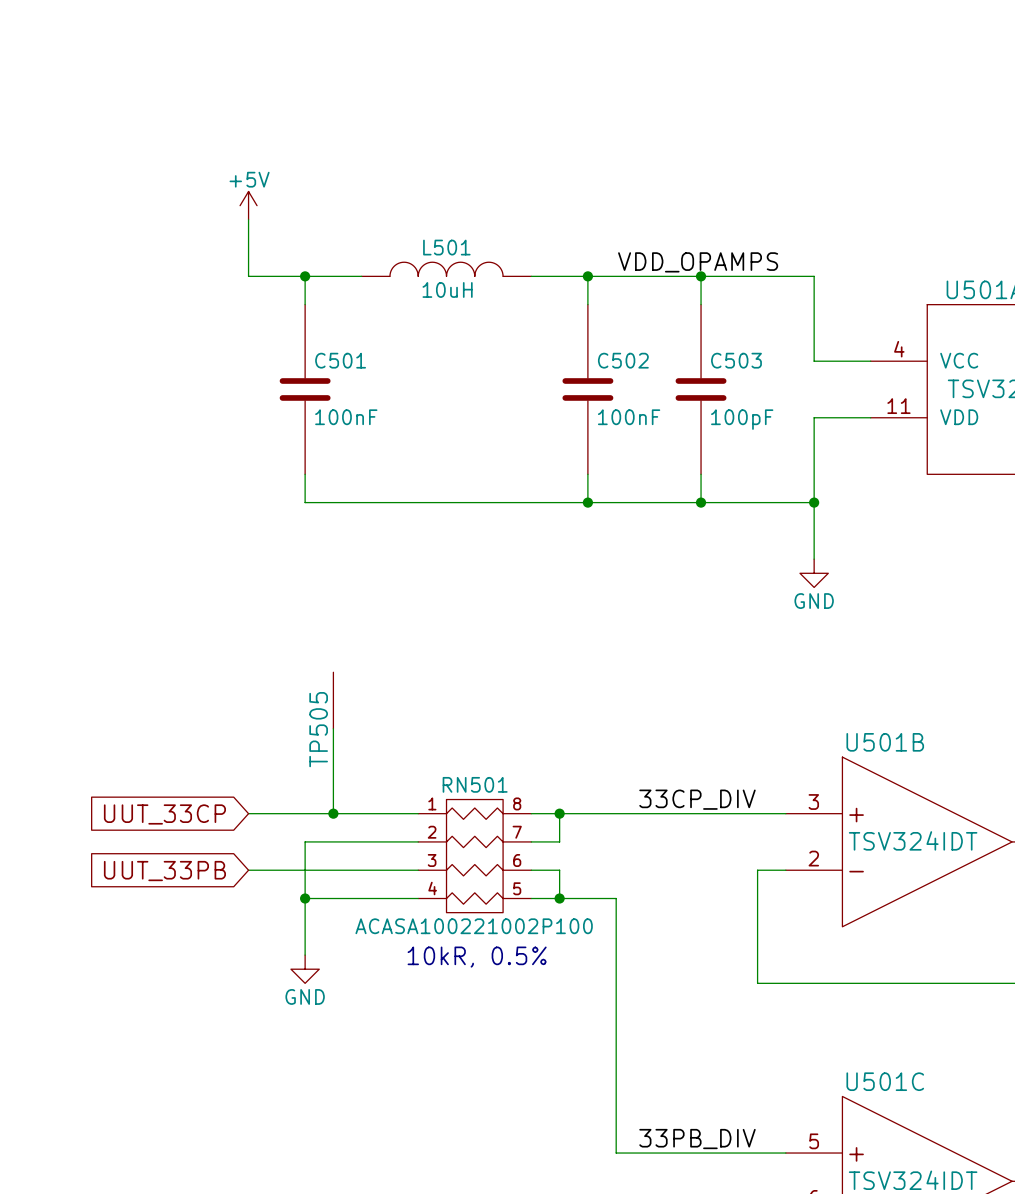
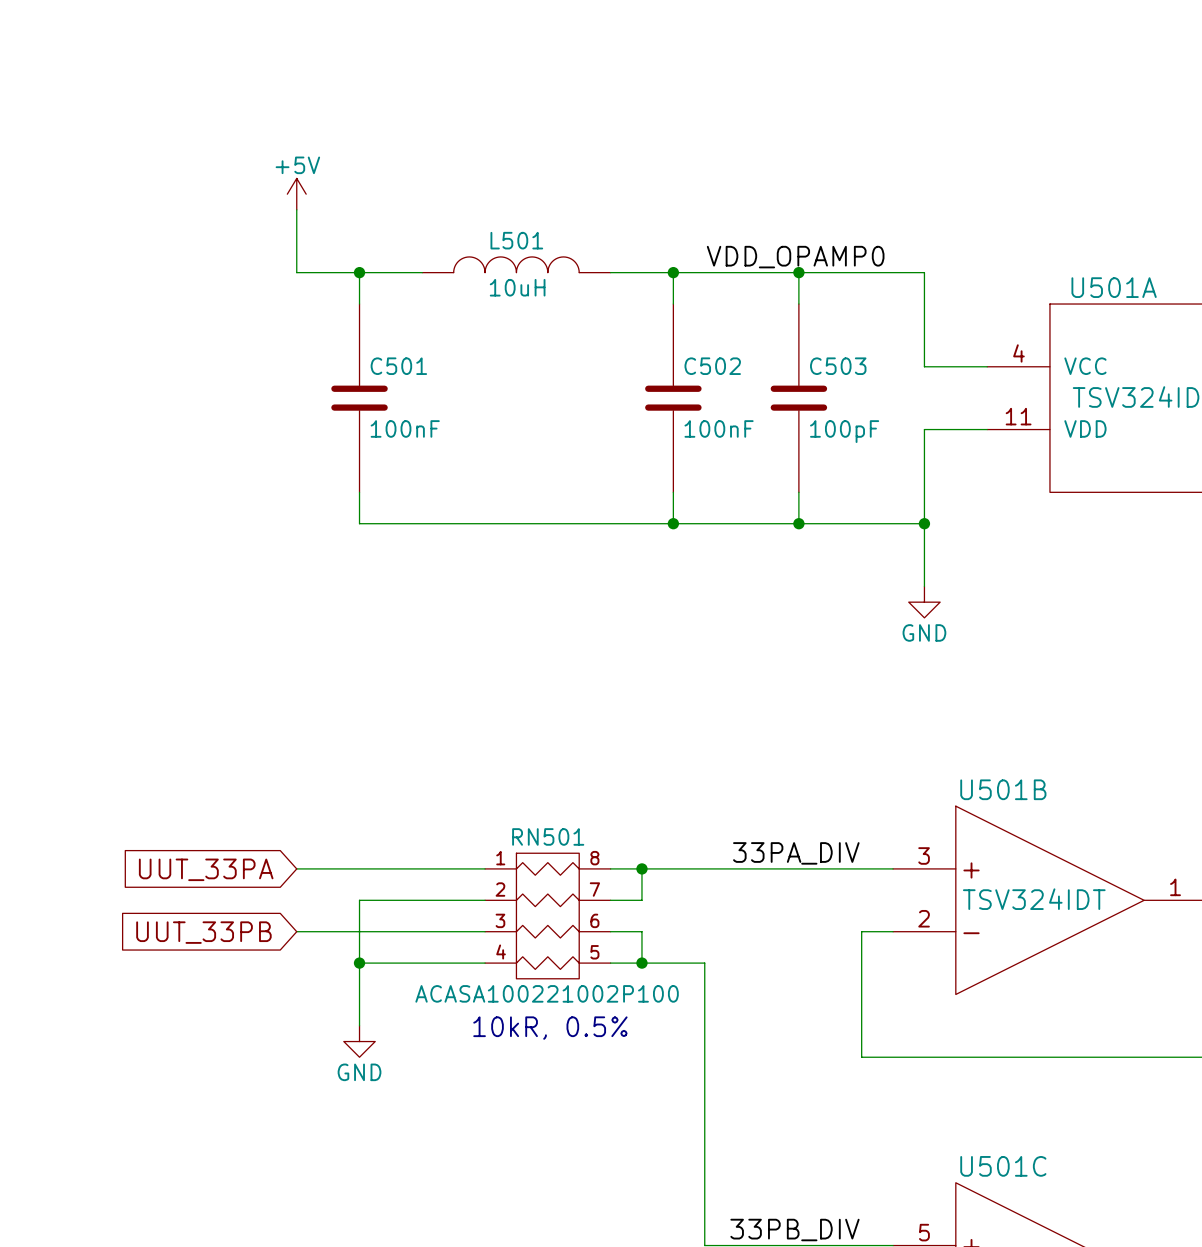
label: VDD_OPAMPS (698, 262) -> VDD_OPAMP0 (795, 257)
TP505: (333, 700) -> none
wire: (333, 728) (333, 813) -> none
label: 33CP_DIV (697, 799) -> 33PA_DIV (796, 853)
junction: (333, 813) -> none
global label: UUT_33CP (164, 814) -> UUT_33PA (206, 869)

